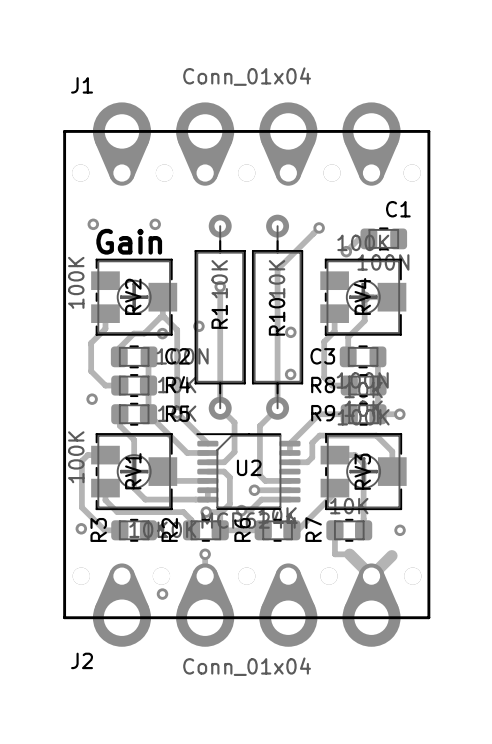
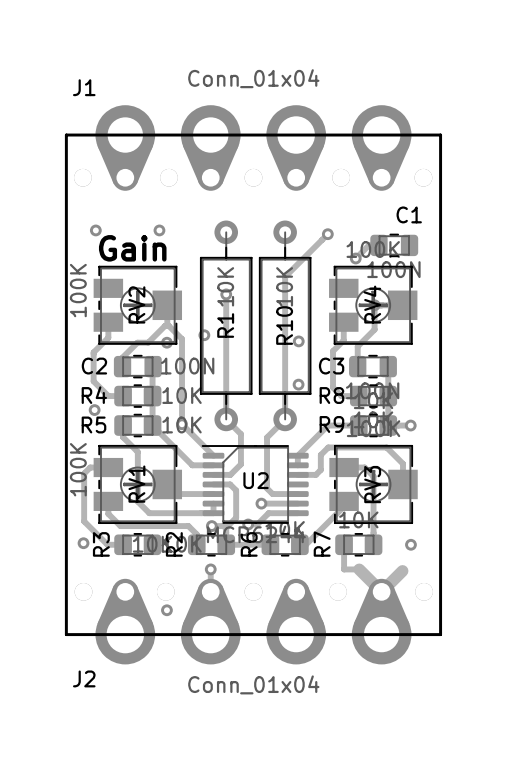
C2 name position: C2 (177, 356) -> C2 (94, 366)
R4 name position: R4 (178, 384) -> R4 (94, 395)
R5 name position: R5 (177, 413) -> R5 (93, 424)

